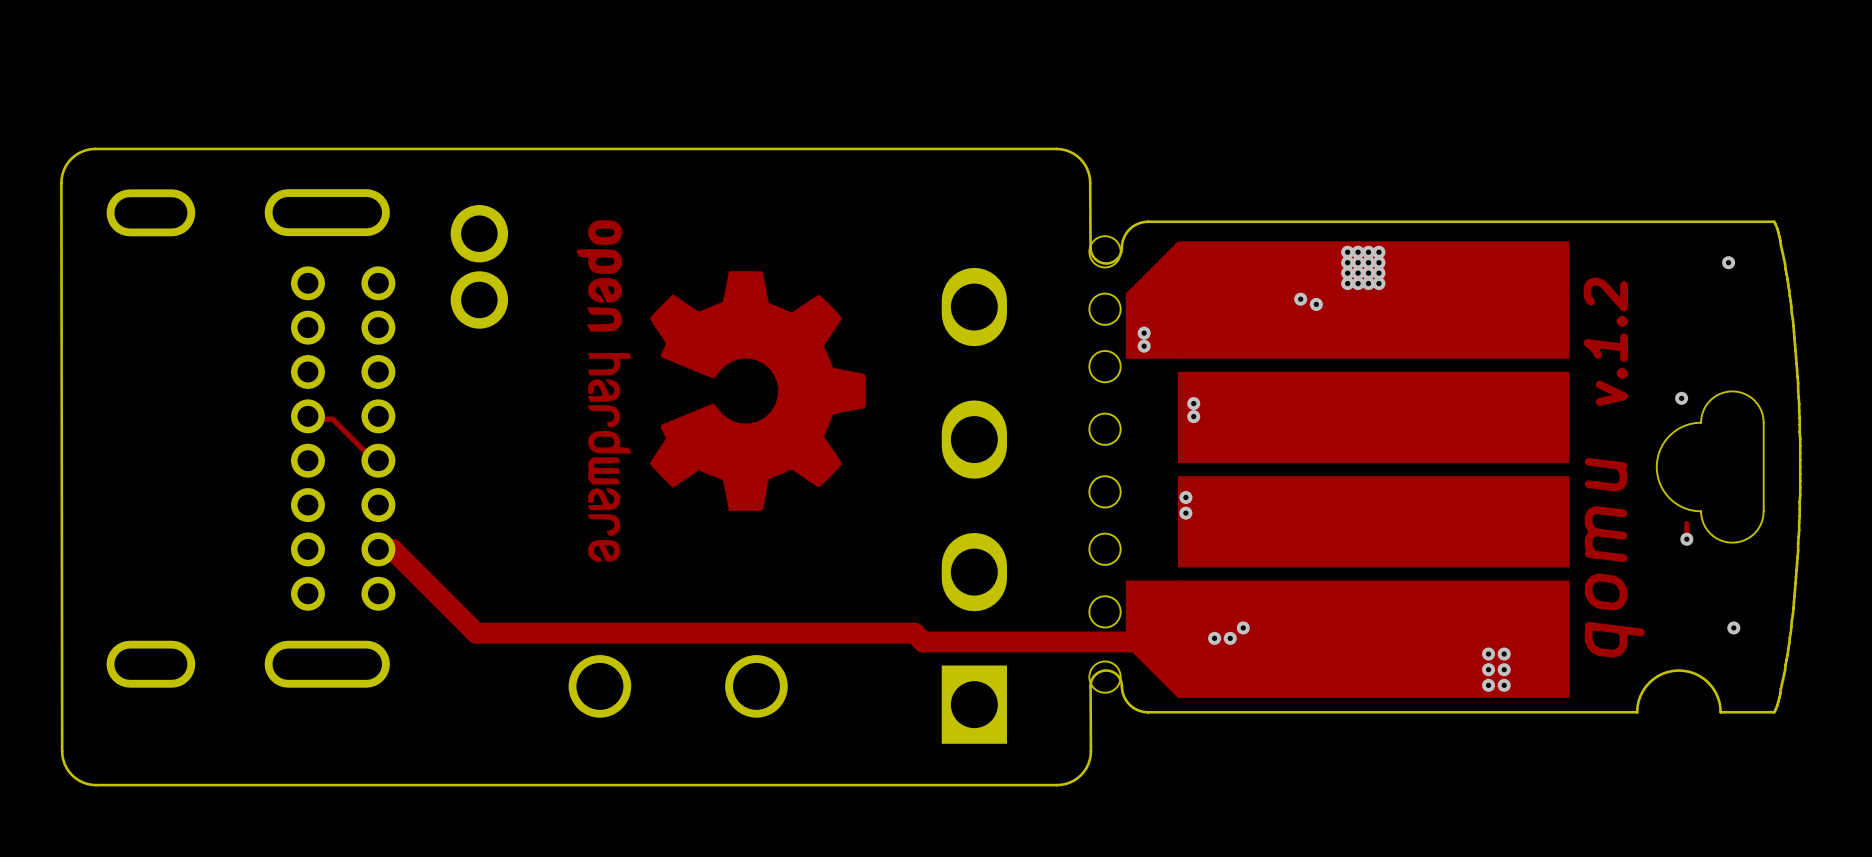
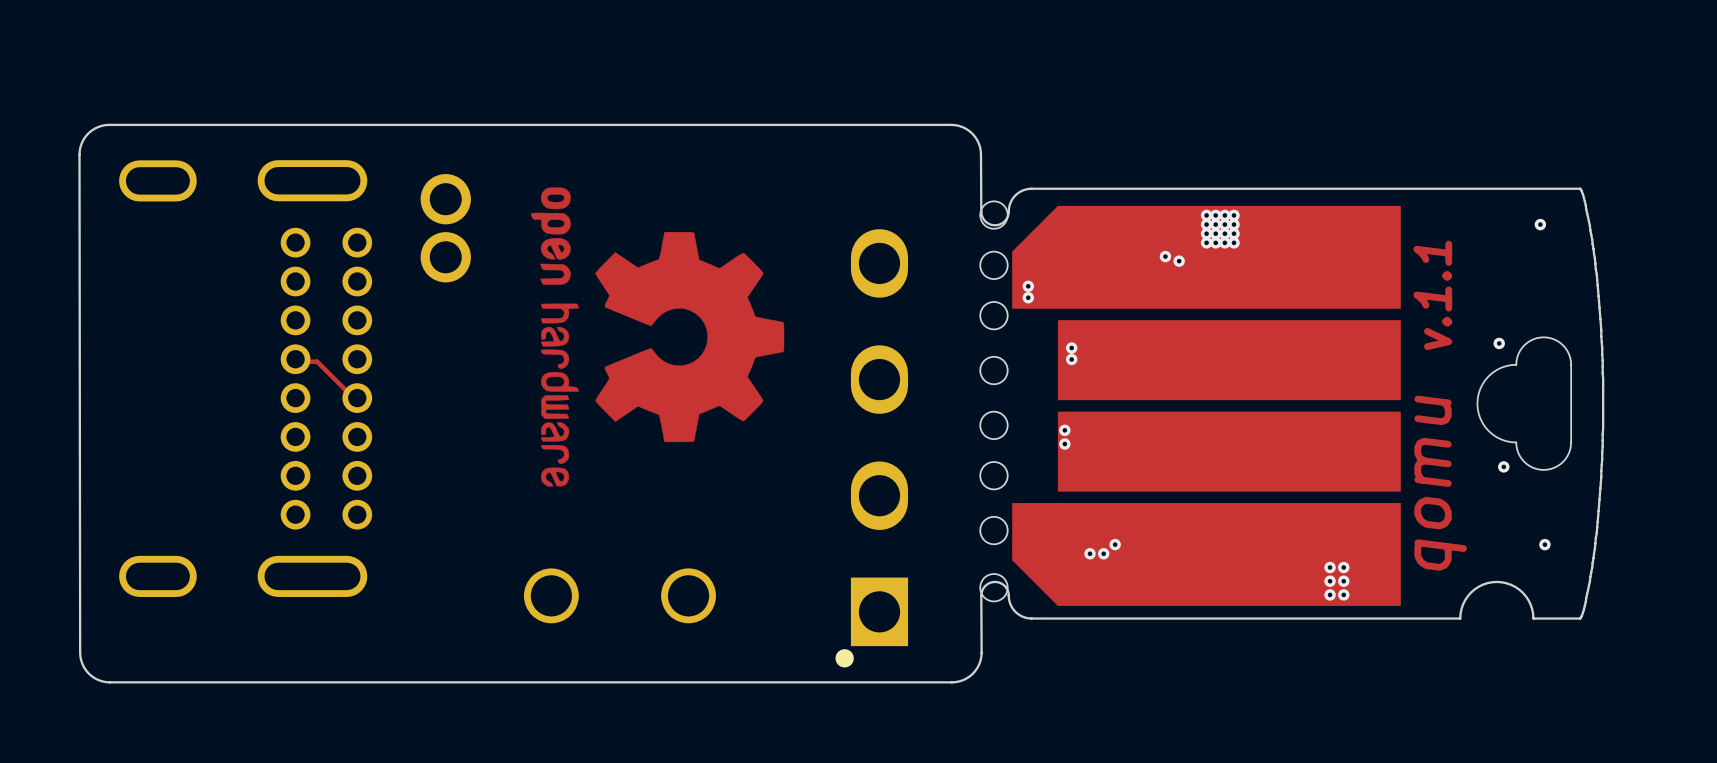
part footprint: [941, 267, 1007, 744] -> [835, 229, 909, 668]
text: v.1.2 (1605, 341) -> v.1.1 (1432, 295)
track: (1686, 523) (1686, 539) -> none
track: (378, 549) (392, 549) (476, 633) (914, 633) (923, 641) (1370, 641) (1373, 639) -> none

